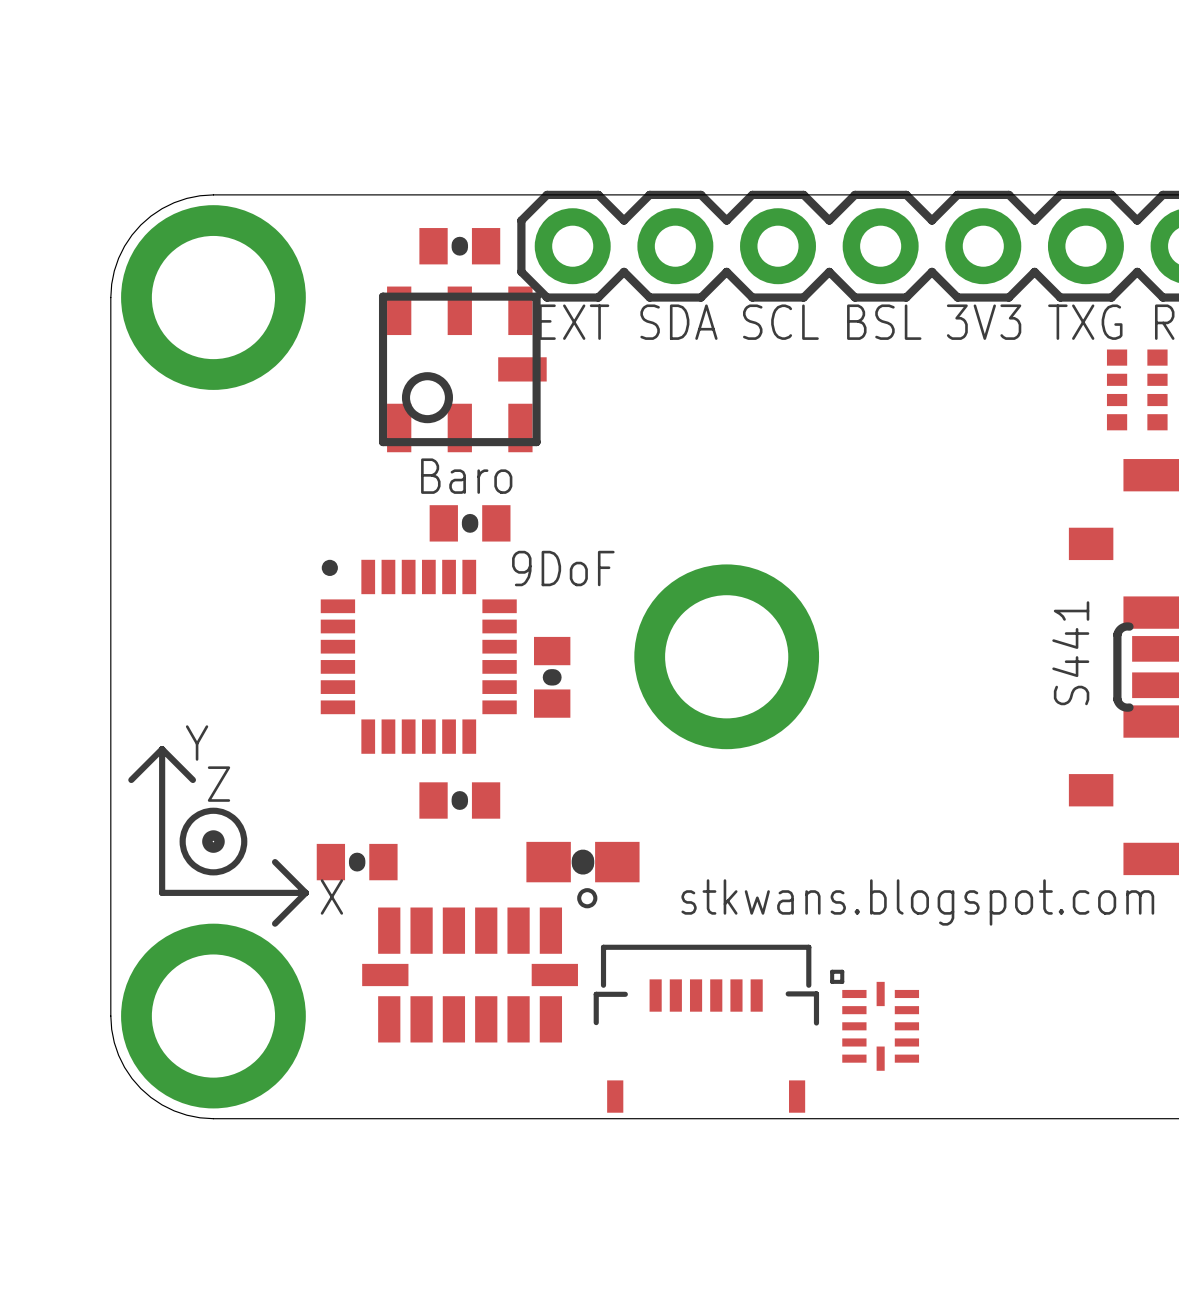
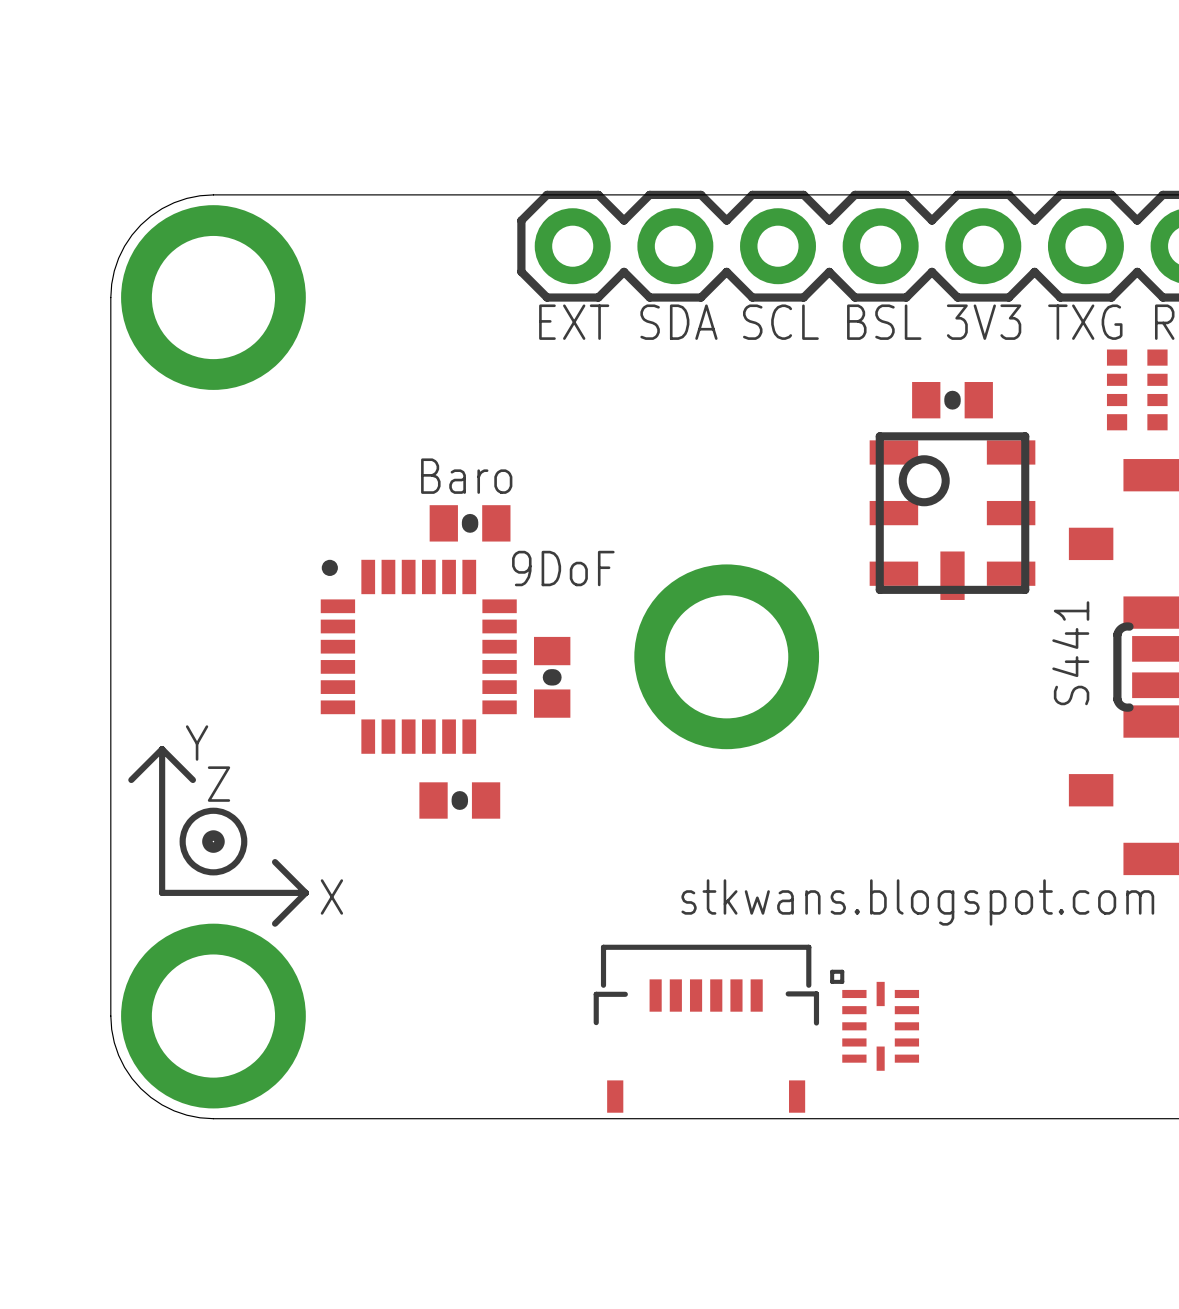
part: (459, 246) -> none
part rotation: 0° (462, 369) -> 90° clockwise (952, 516)
part position: (462, 369) -> (952, 516)
part: none -> (952, 400)
part: (357, 862) -> none
part: (582, 862) -> none
part: (479, 965) -> none

